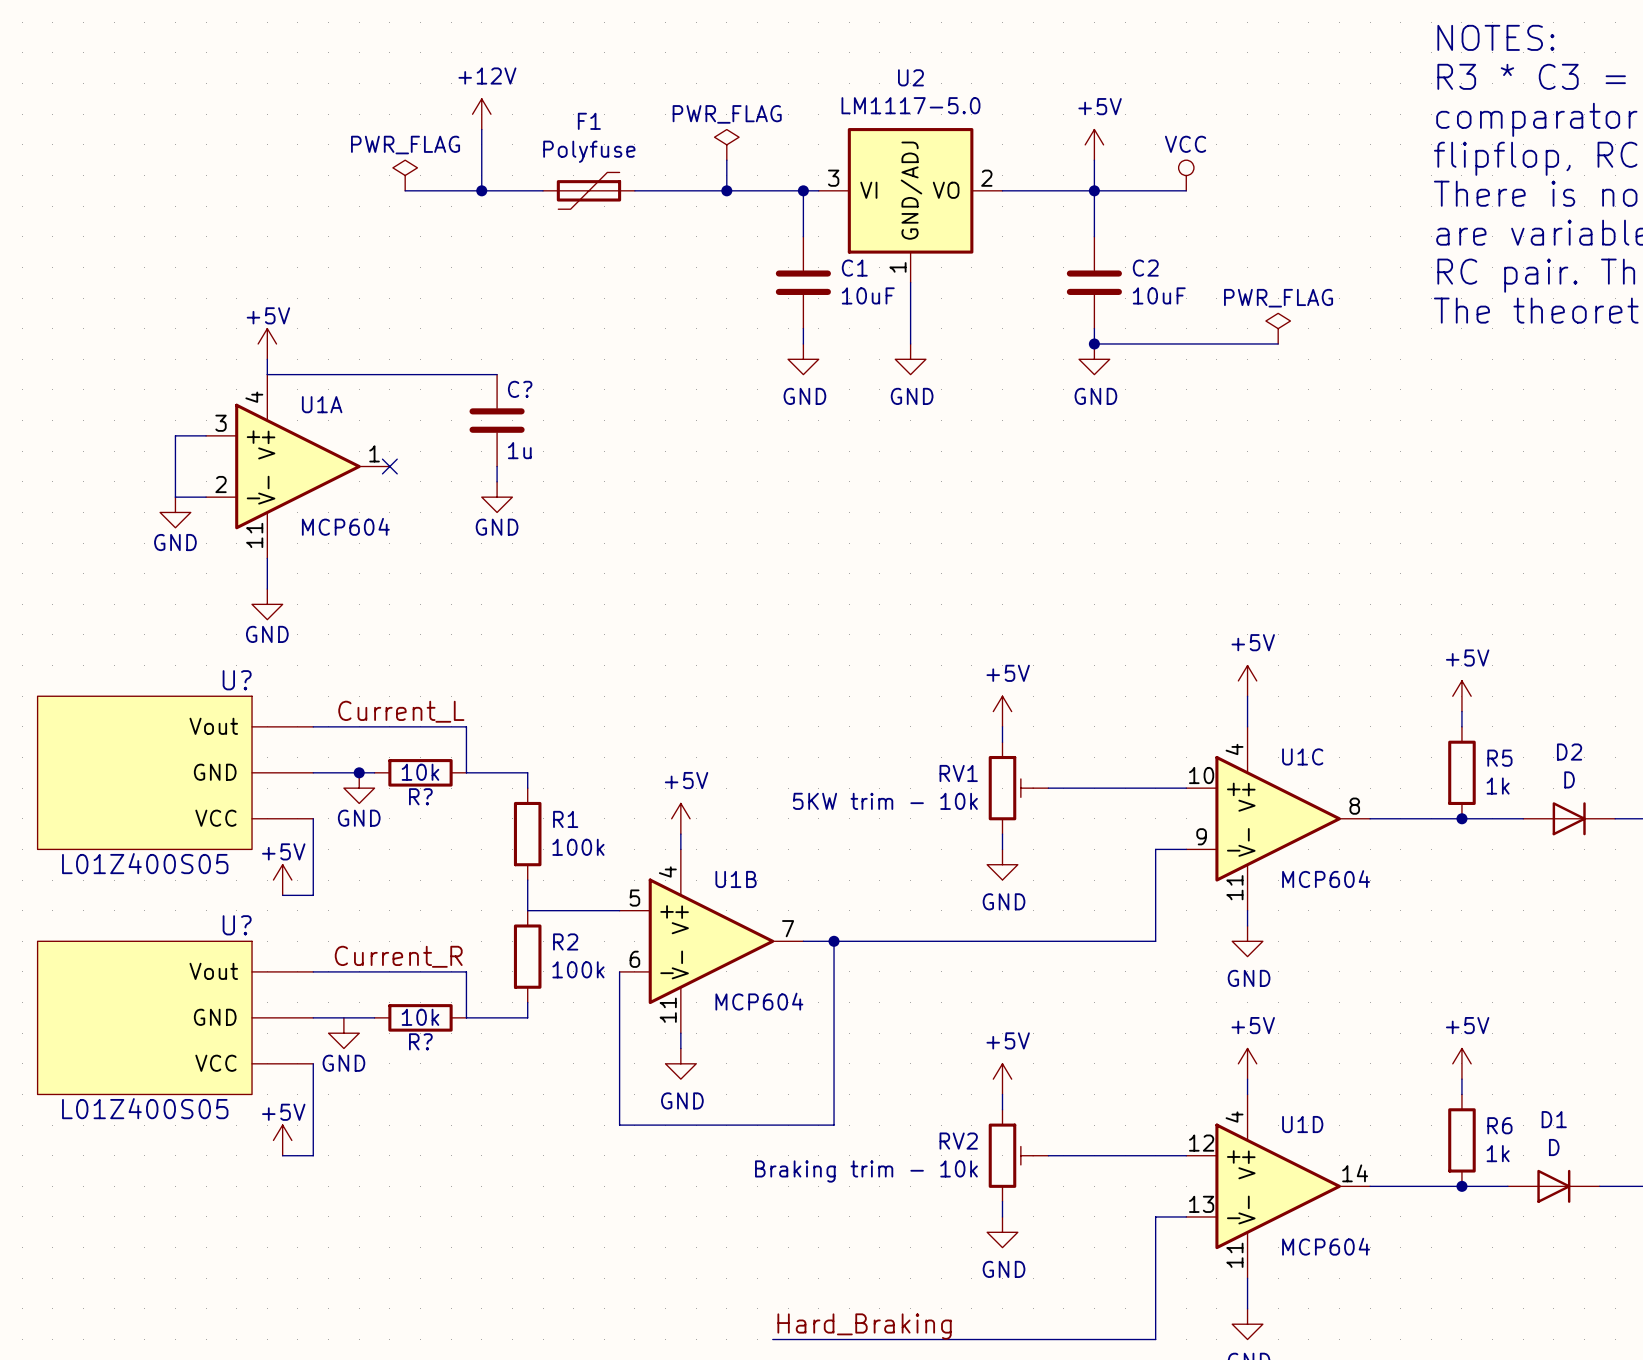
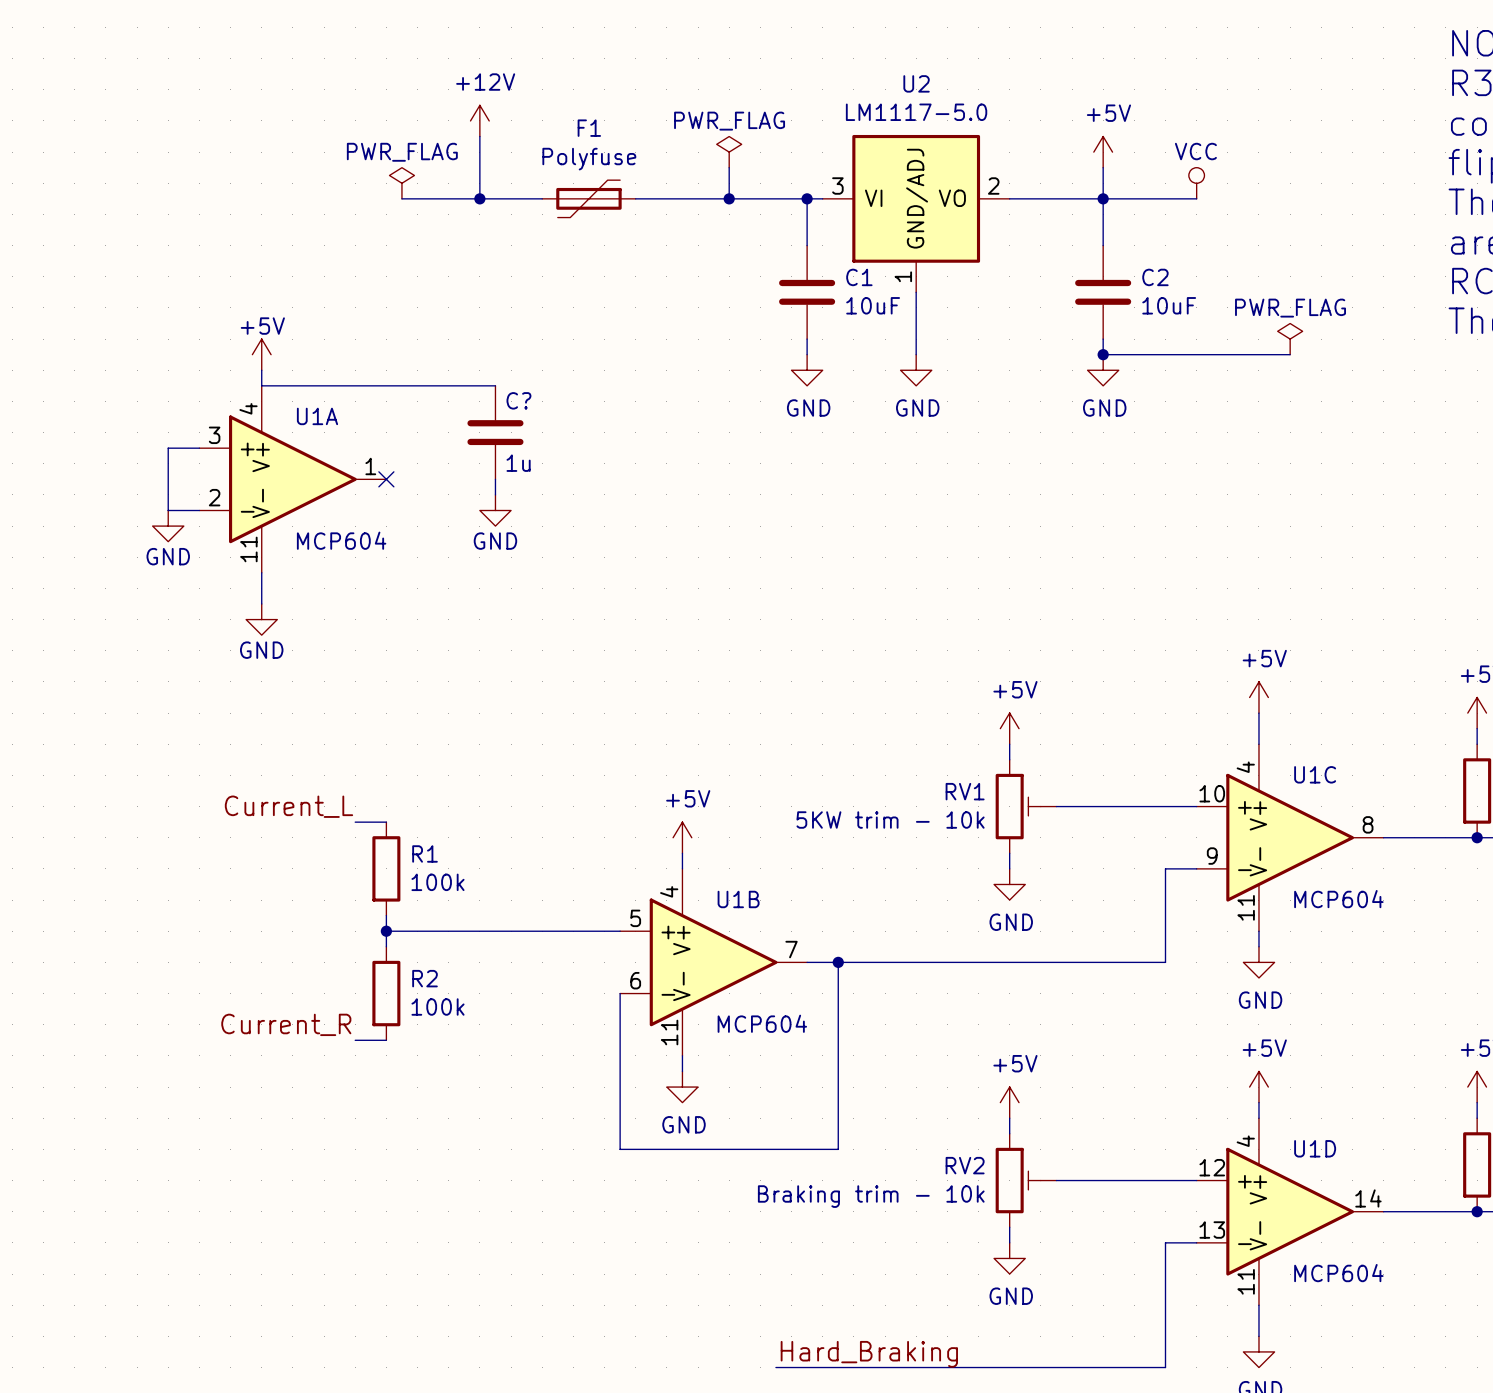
label position: Current_L (401, 711) -> Current_L (288, 806)
wire: (313, 726) (466, 726) (466, 772) (527, 772) (527, 788) -> none
U?: L01Z400S05 (175, 772) -> none
wire: (313, 772) (374, 772) -> none
junction: (359, 772) -> none
R?: 10k (420, 772) -> none
power symbol: GND (359, 788) -> none
wire: none -> (355, 822) (386, 822)
wire: (313, 818) (313, 895) (282, 895) -> none
R1 position: (527, 834) -> (386, 868)
power symbol: +5V (282, 880) -> none
wire: (527, 880) (527, 910) -> (386, 931) (526, 931)
wire: none -> (386, 915) (386, 946)
junction: none -> (386, 931)
label position: Current_R (398, 956) -> Current_R (286, 1024)
R2 position: (527, 956) -> (386, 993)
wire: (313, 971) (466, 971) (466, 1017) (527, 1017) (527, 1002) -> none
U?: L01Z400S05 (175, 1017) -> none
wire: (313, 1017) (359, 1017) -> none
R?: 10k (420, 1017) -> none
power symbol: GND (343, 1033) -> none
wire: (313, 1063) (313, 1155) (282, 1155) -> none
power symbol: +5V (282, 1140) -> none

